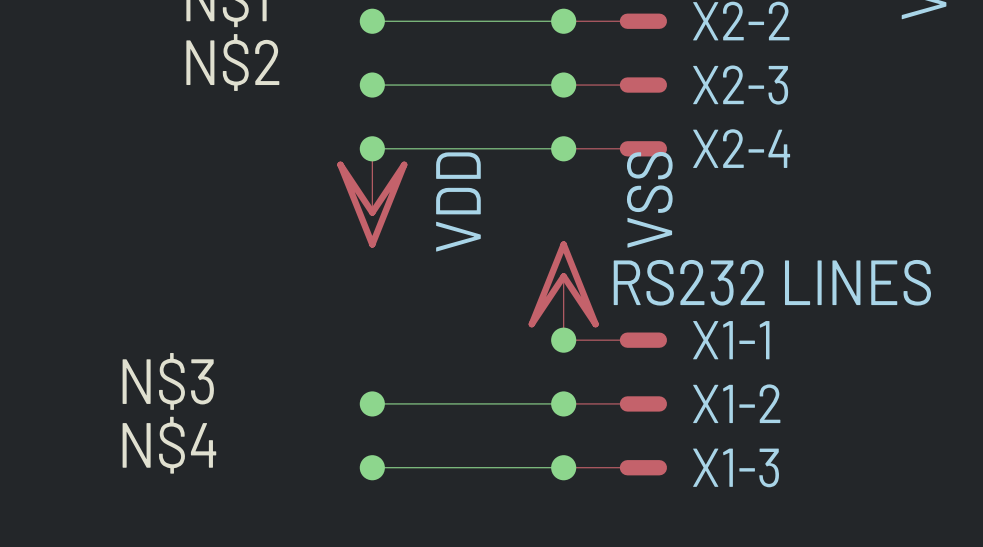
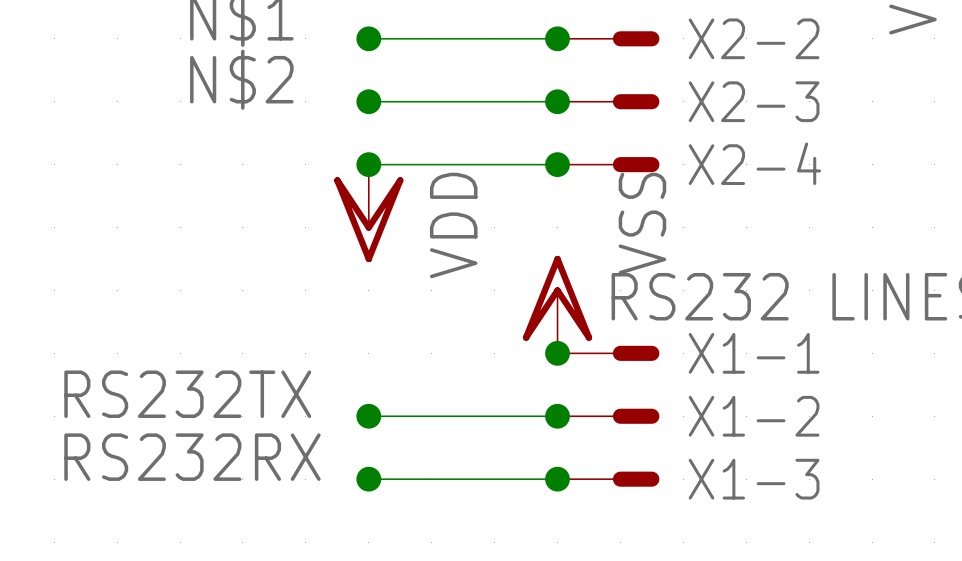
label: N$3 (168, 381) -> none
label: none -> RS232TX (187, 394)
label: N$4 (169, 445) -> none
label: none -> RS232RX (192, 457)

